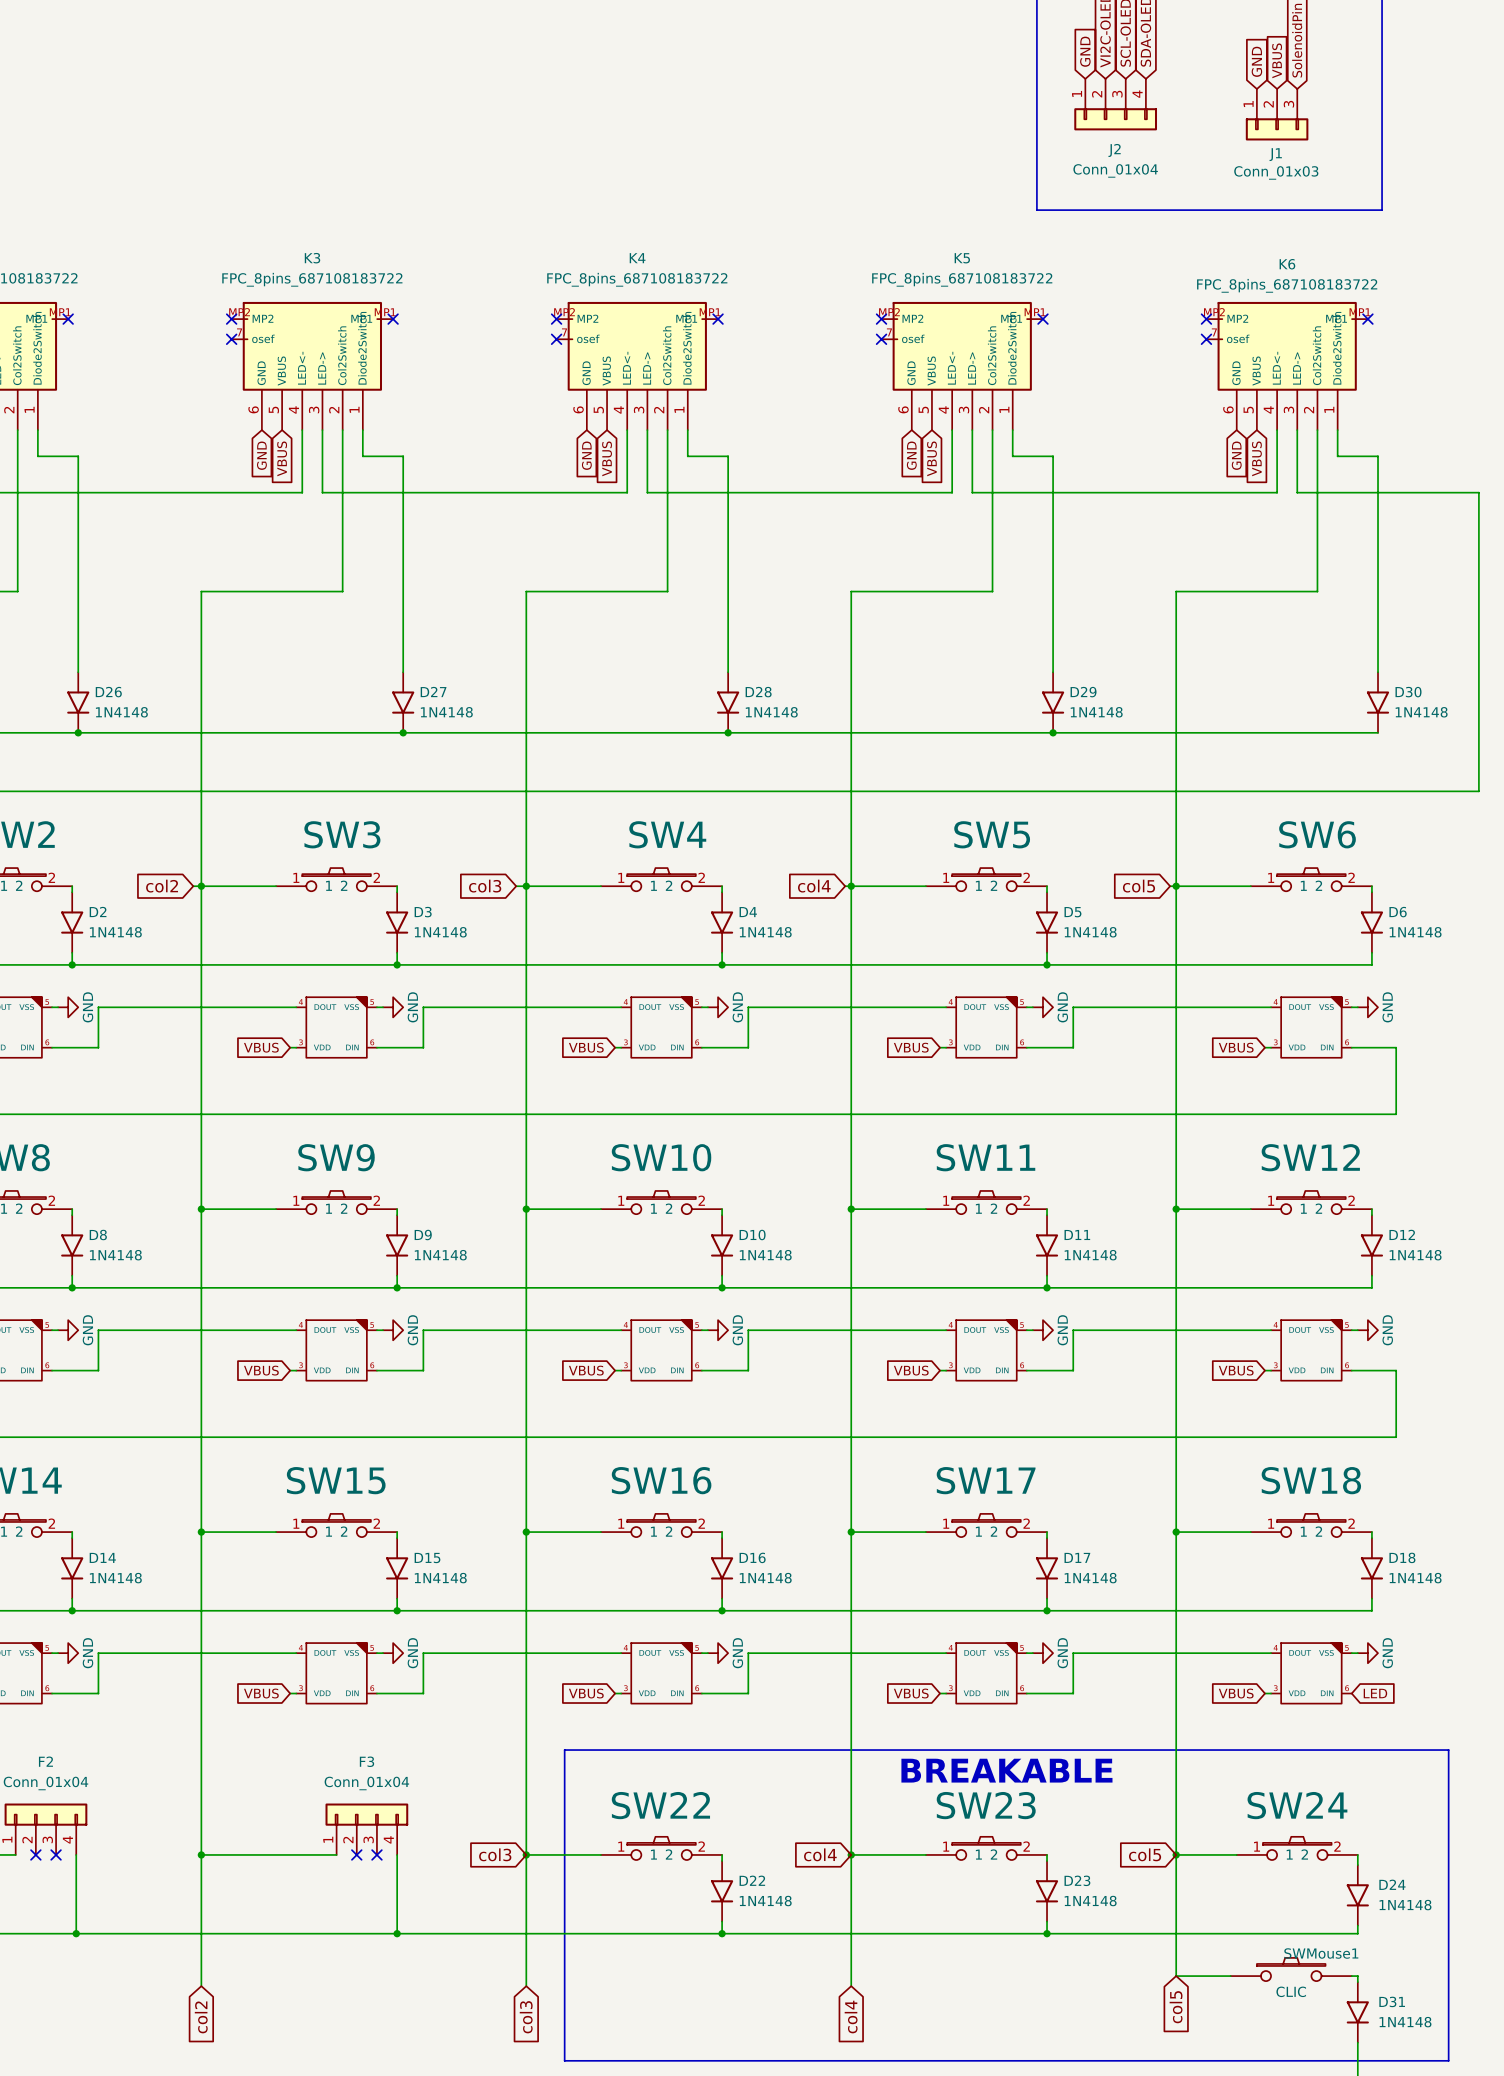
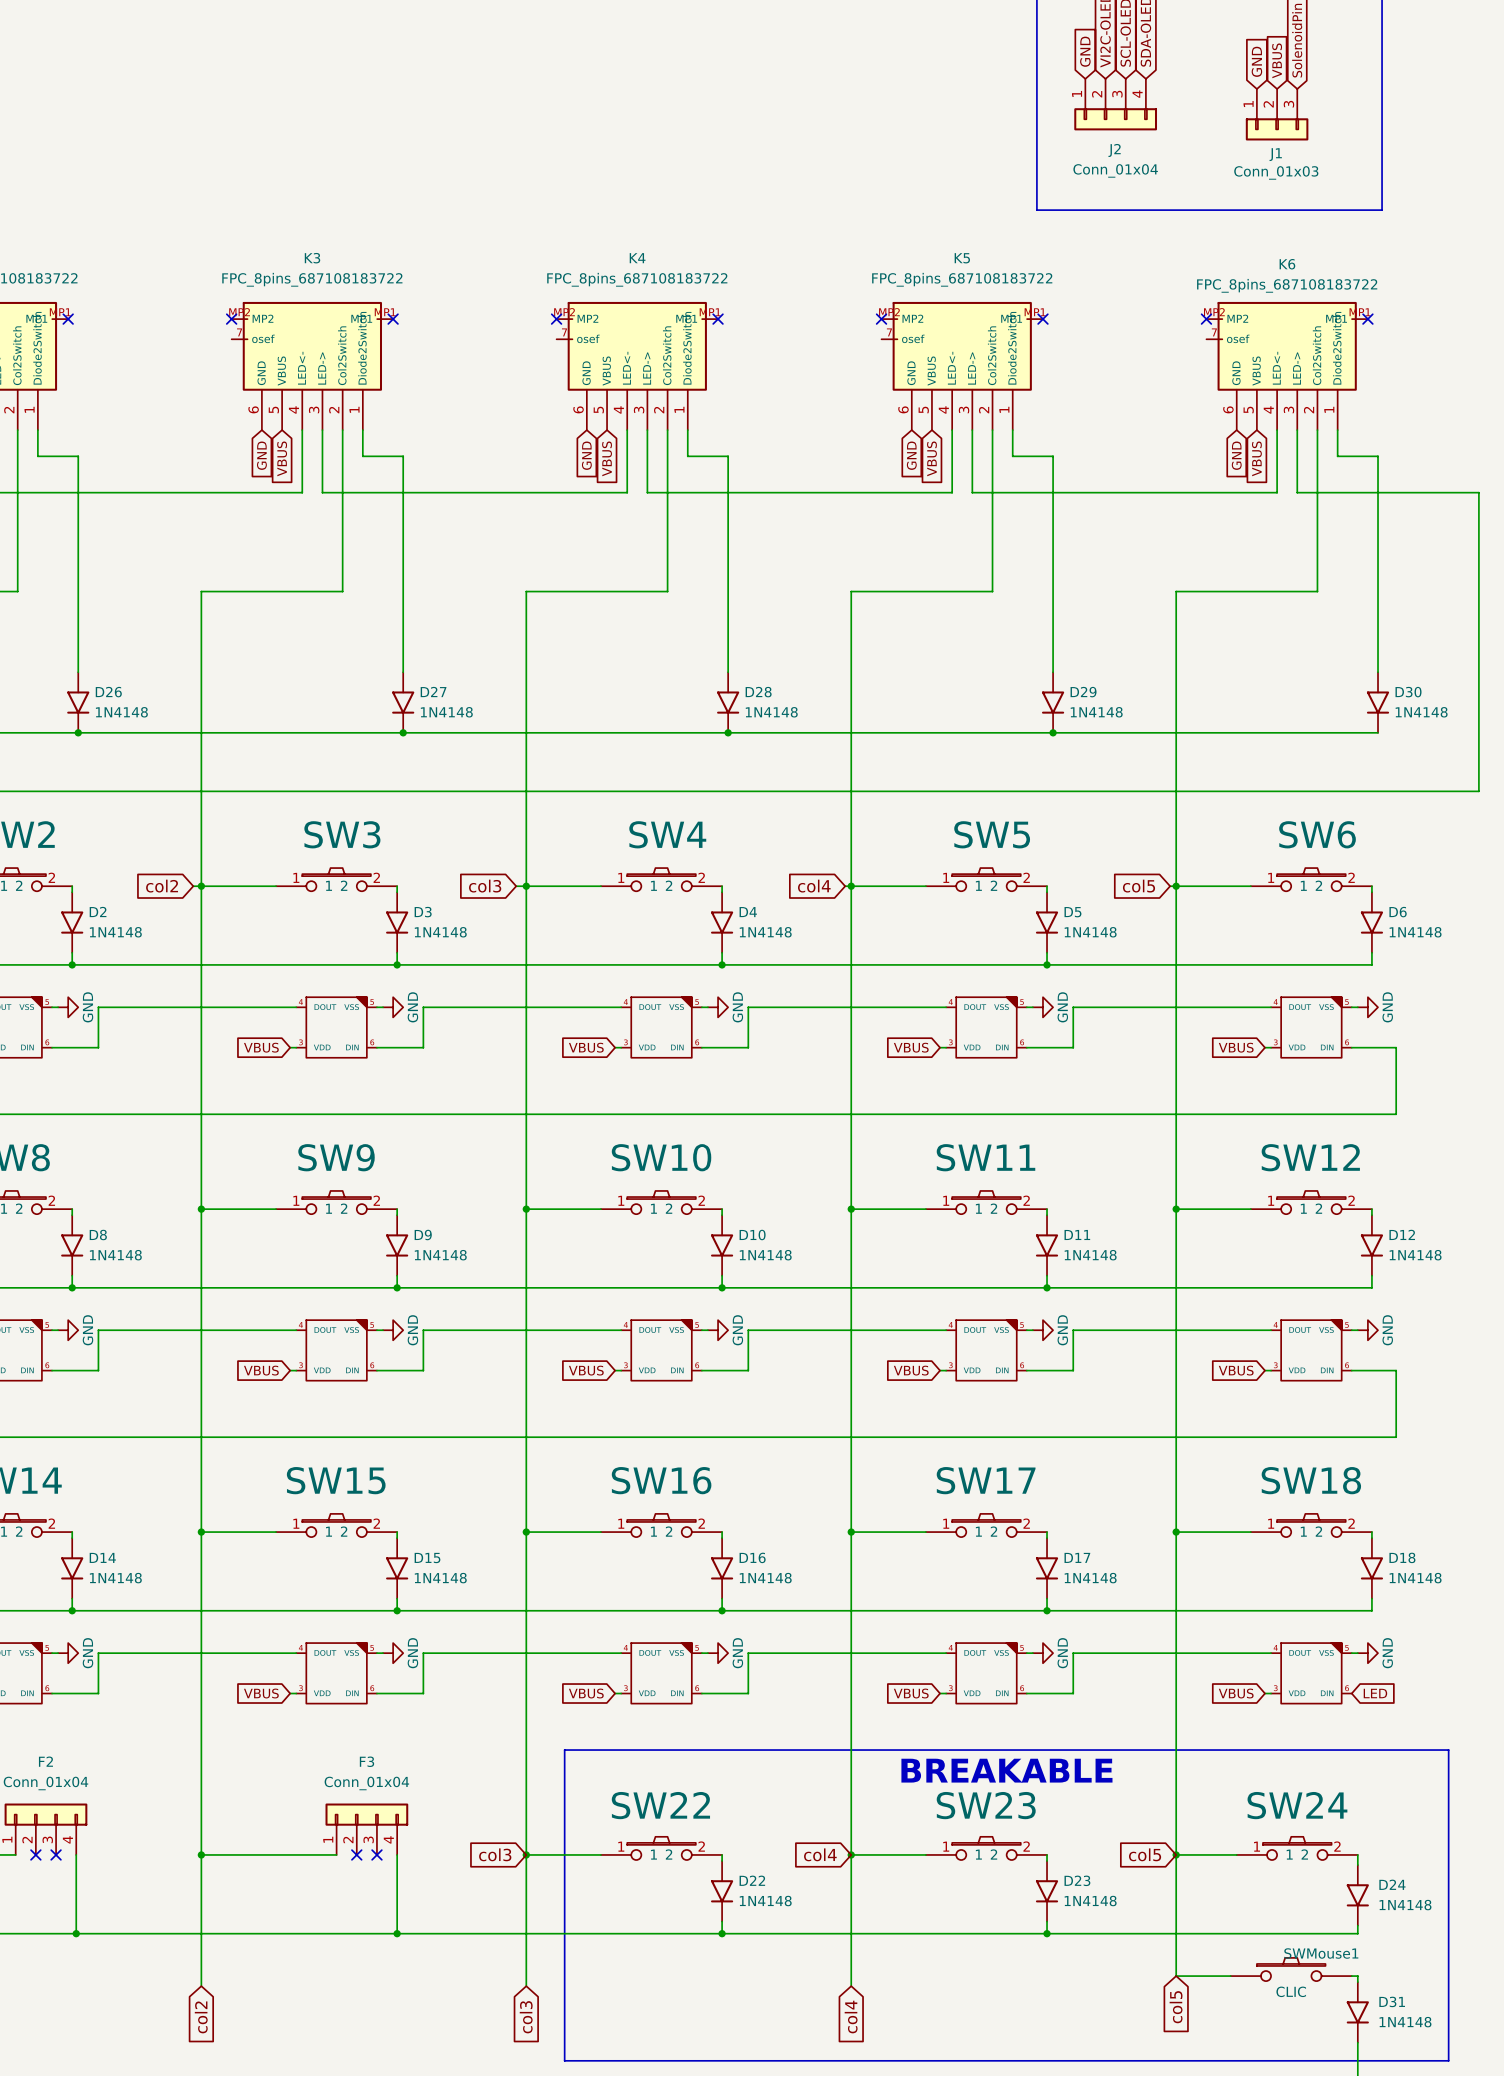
no-connect mark: (231, 339) -> none
no-connect mark: (556, 339) -> none
no-connect mark: (881, 339) -> none
no-connect mark: (1206, 339) -> none

